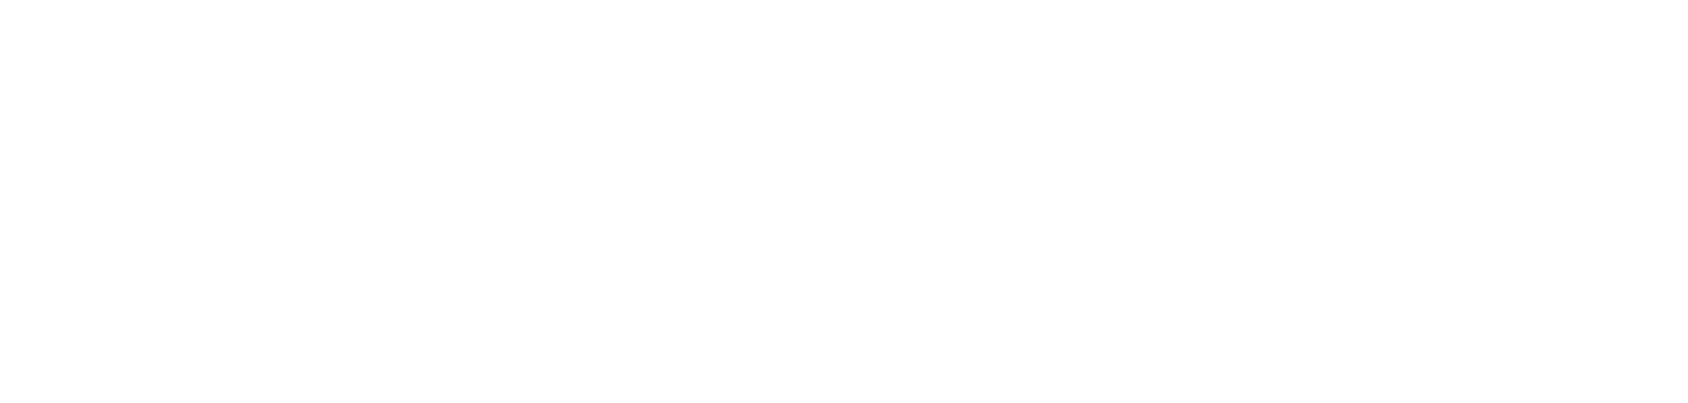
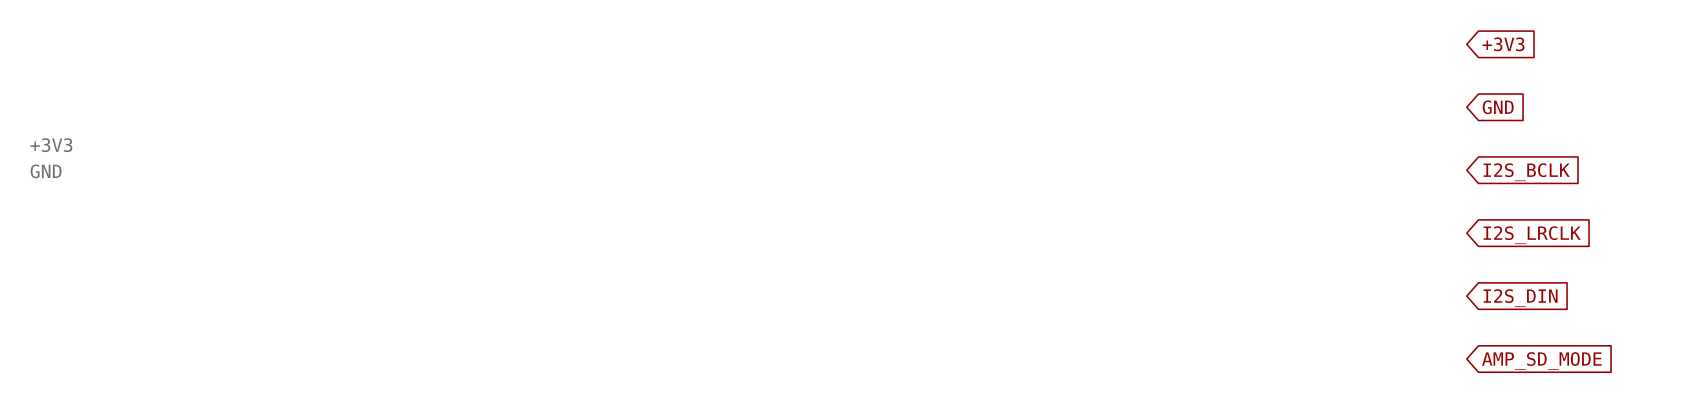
global label: none -> +3V3 (1503, 44)
global label: none -> GND (1498, 107)
label: none -> +3V3 (51, 145)
label: none -> GND (46, 171)
global label: none -> I2S_BCLK (1526, 172)
global label: none -> I2S_LRCLK (1532, 235)
global label: none -> I2S_DIN (1520, 298)
global label: none -> AMP_SD_MODE (1541, 361)

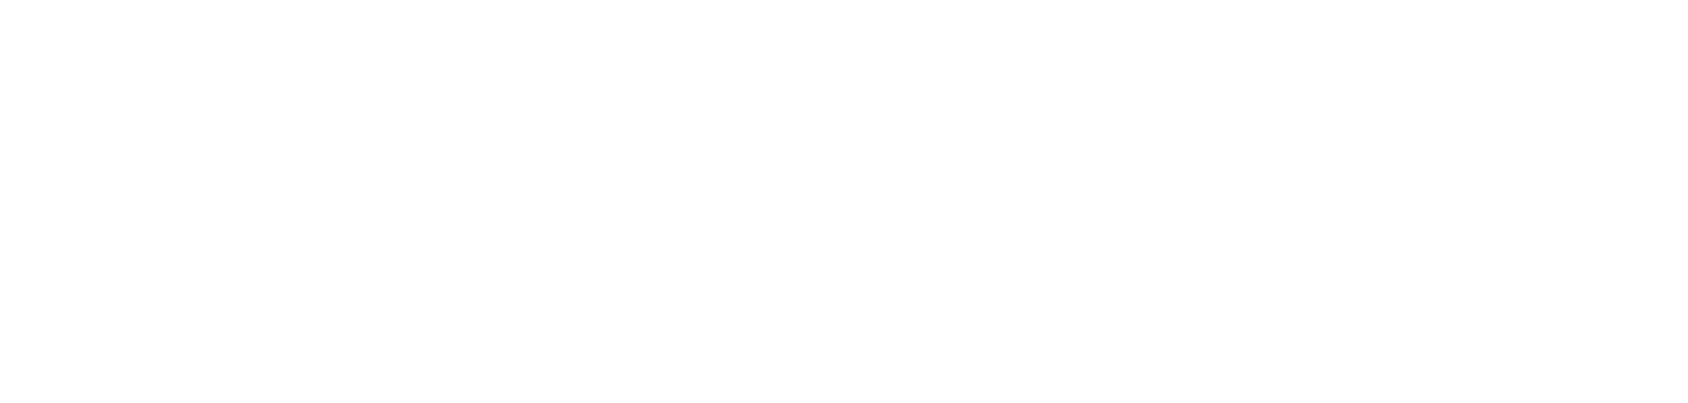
global label: +3V3 (1503, 44) -> none
global label: GND (1498, 107) -> none
label: +3V3 (51, 145) -> none
label: GND (46, 171) -> none
global label: I2S_BCLK (1526, 172) -> none
global label: I2S_LRCLK (1532, 235) -> none
global label: I2S_DIN (1520, 298) -> none
global label: AMP_SD_MODE (1541, 361) -> none

